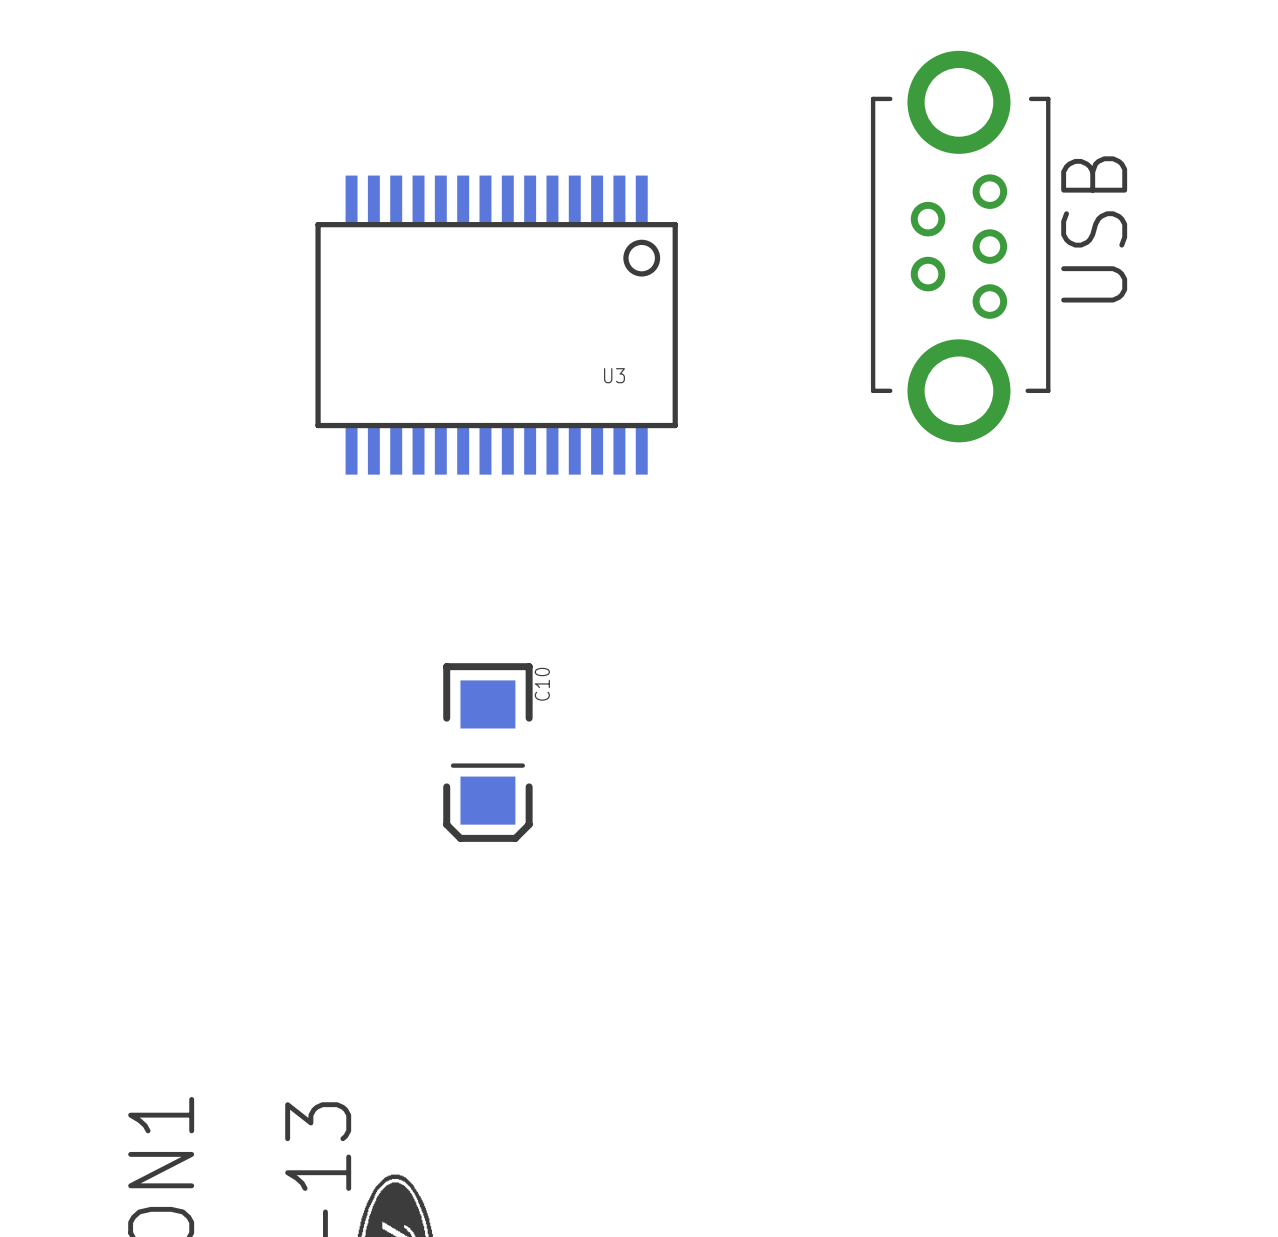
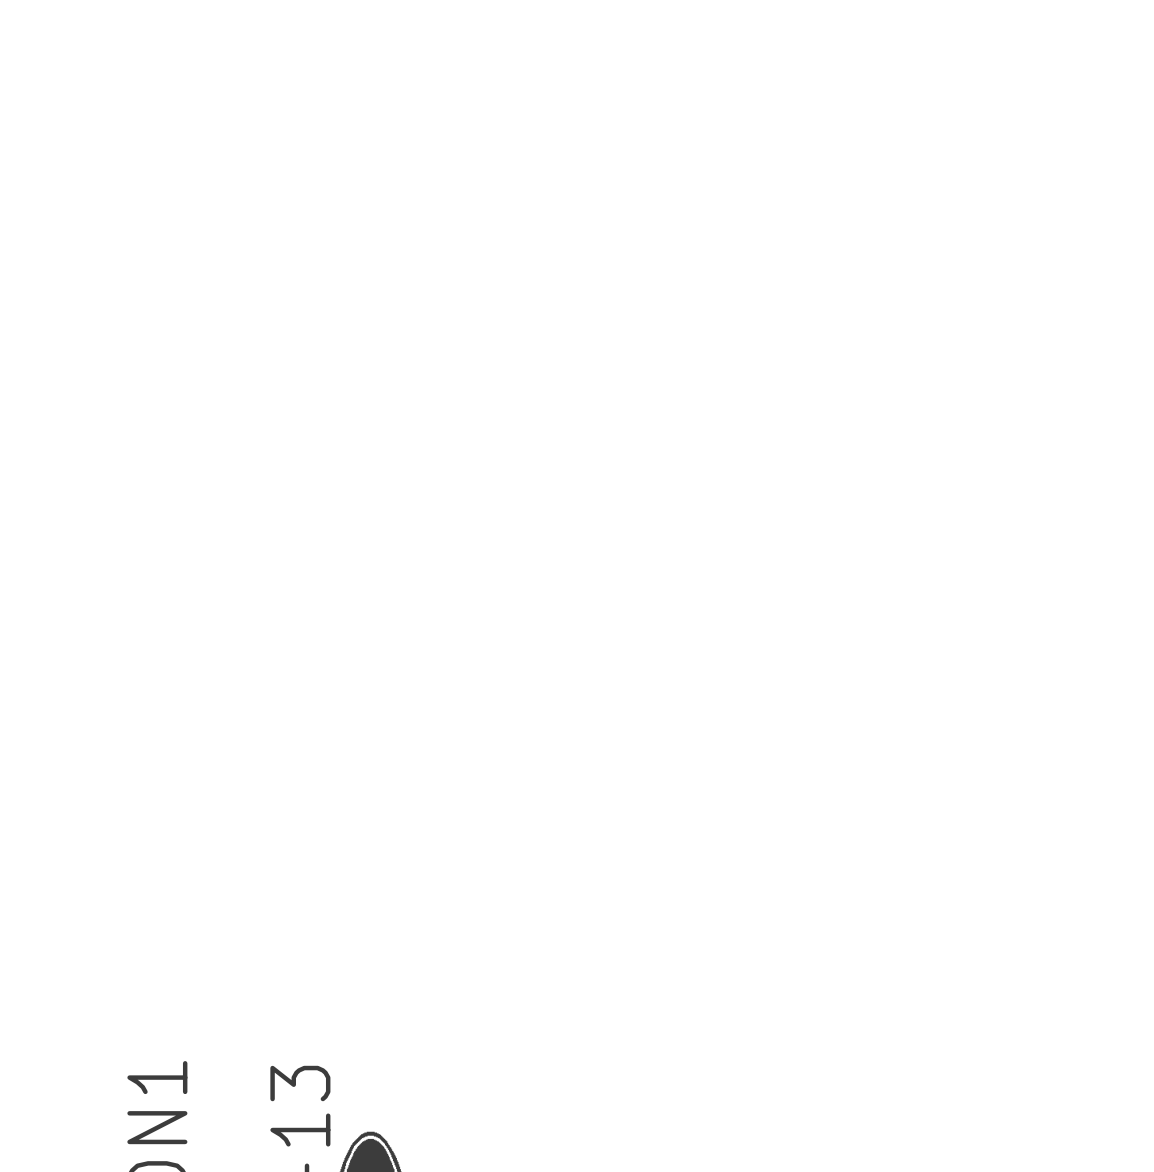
part: (960, 246) -> none
U3: (496, 325) -> none
C10: (487, 752) -> none

